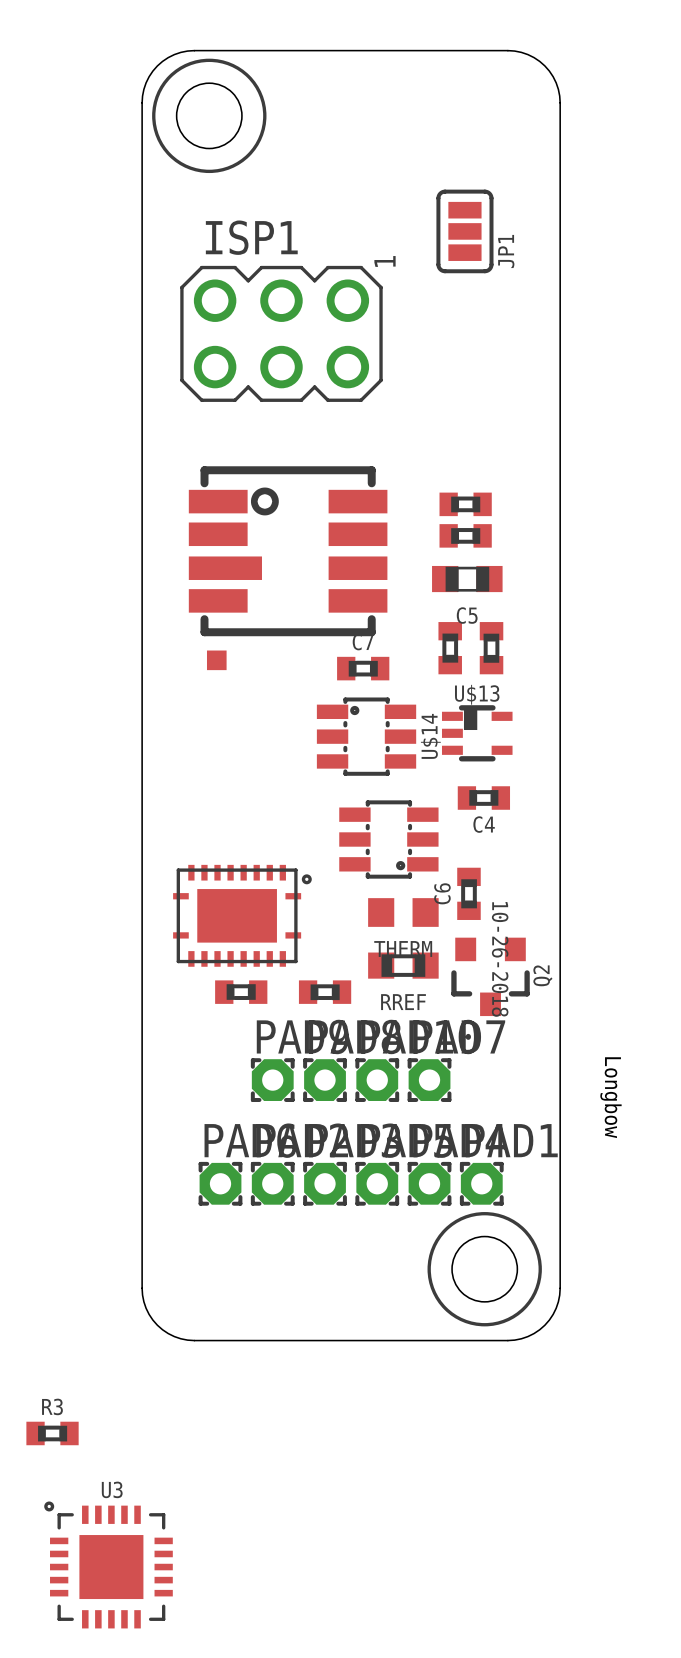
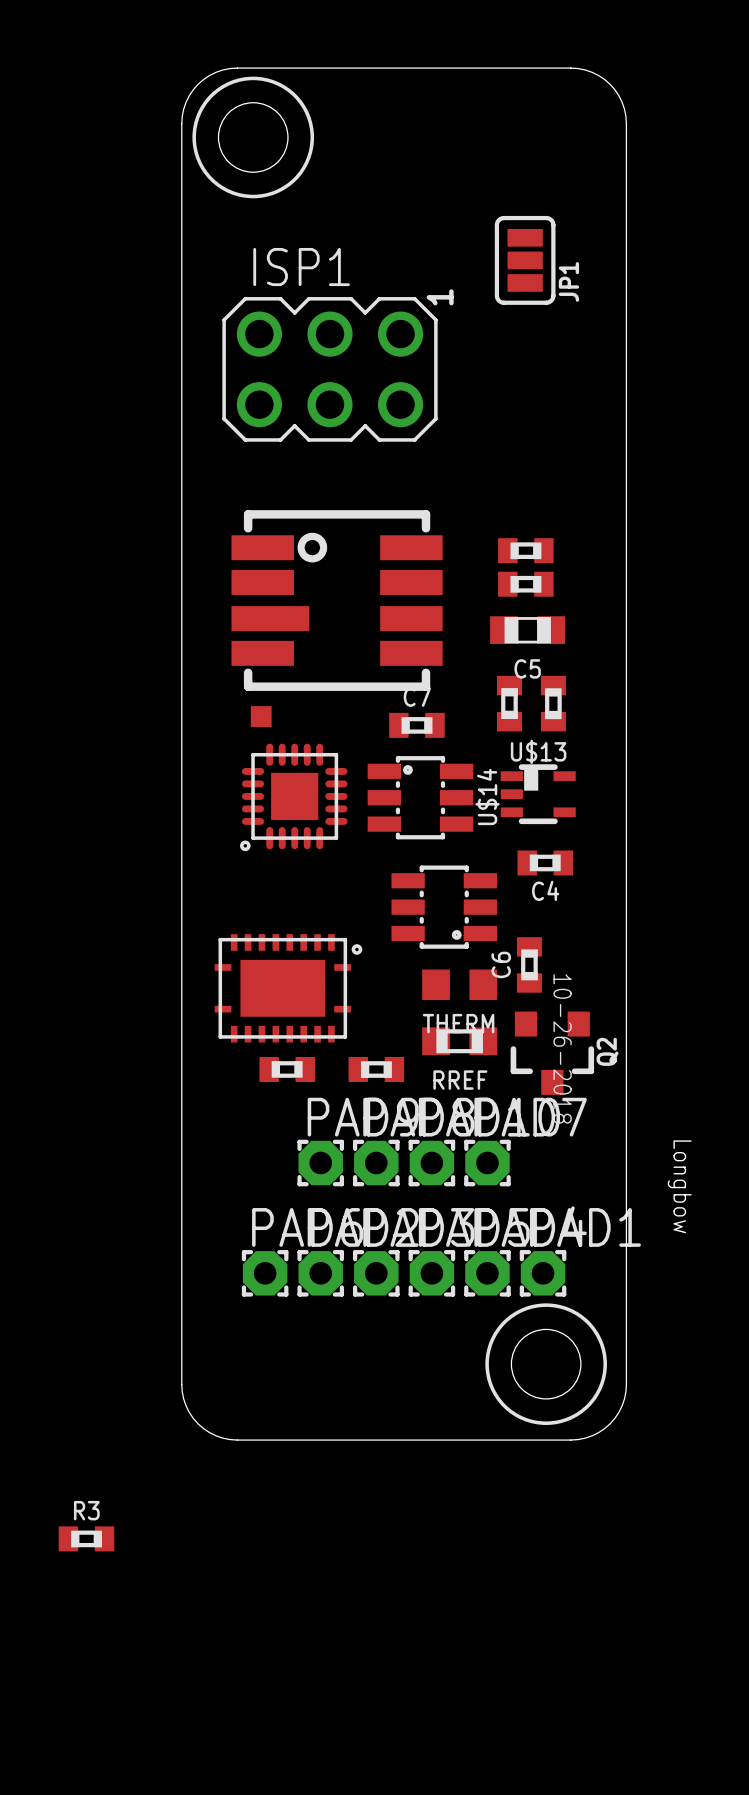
part: none -> (293, 797)
U3: (108, 1564) -> none

